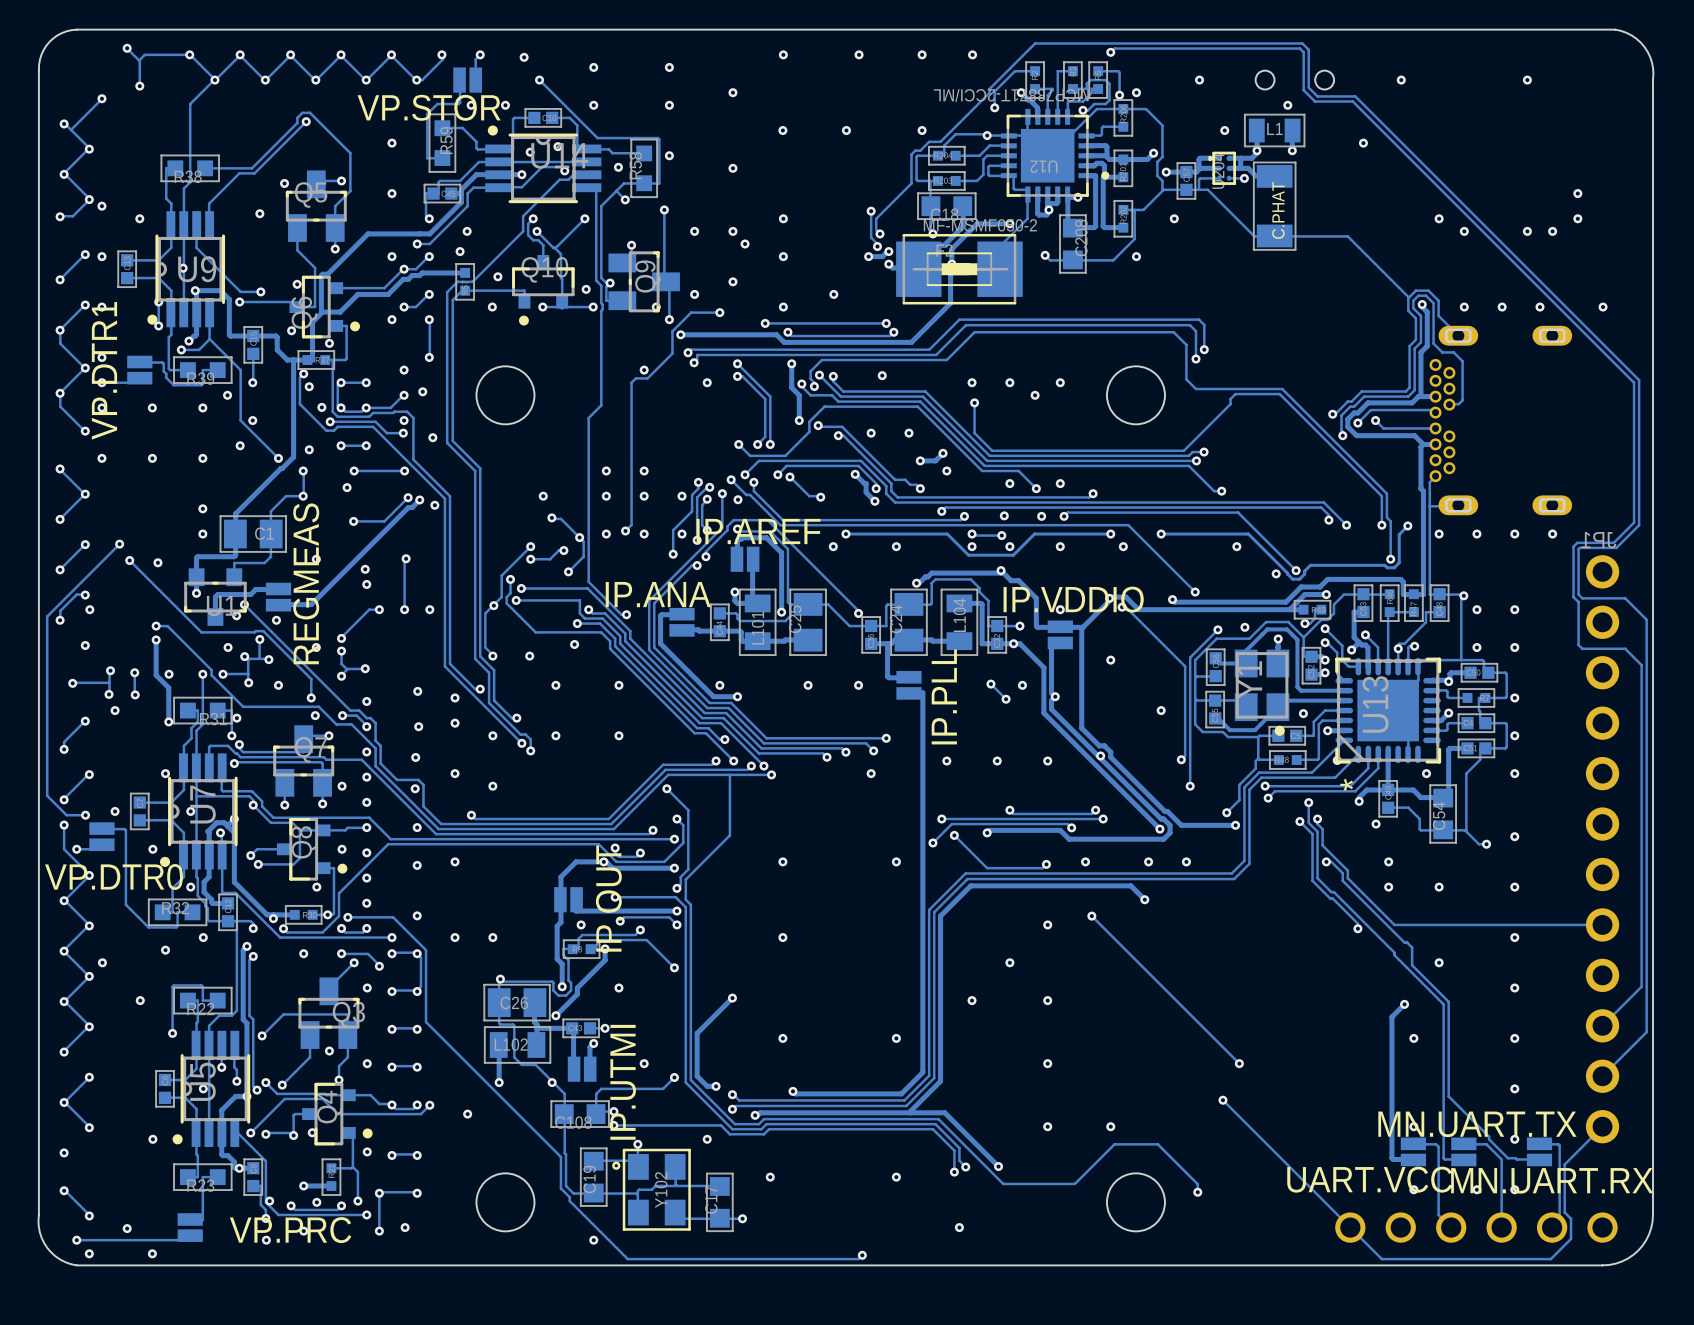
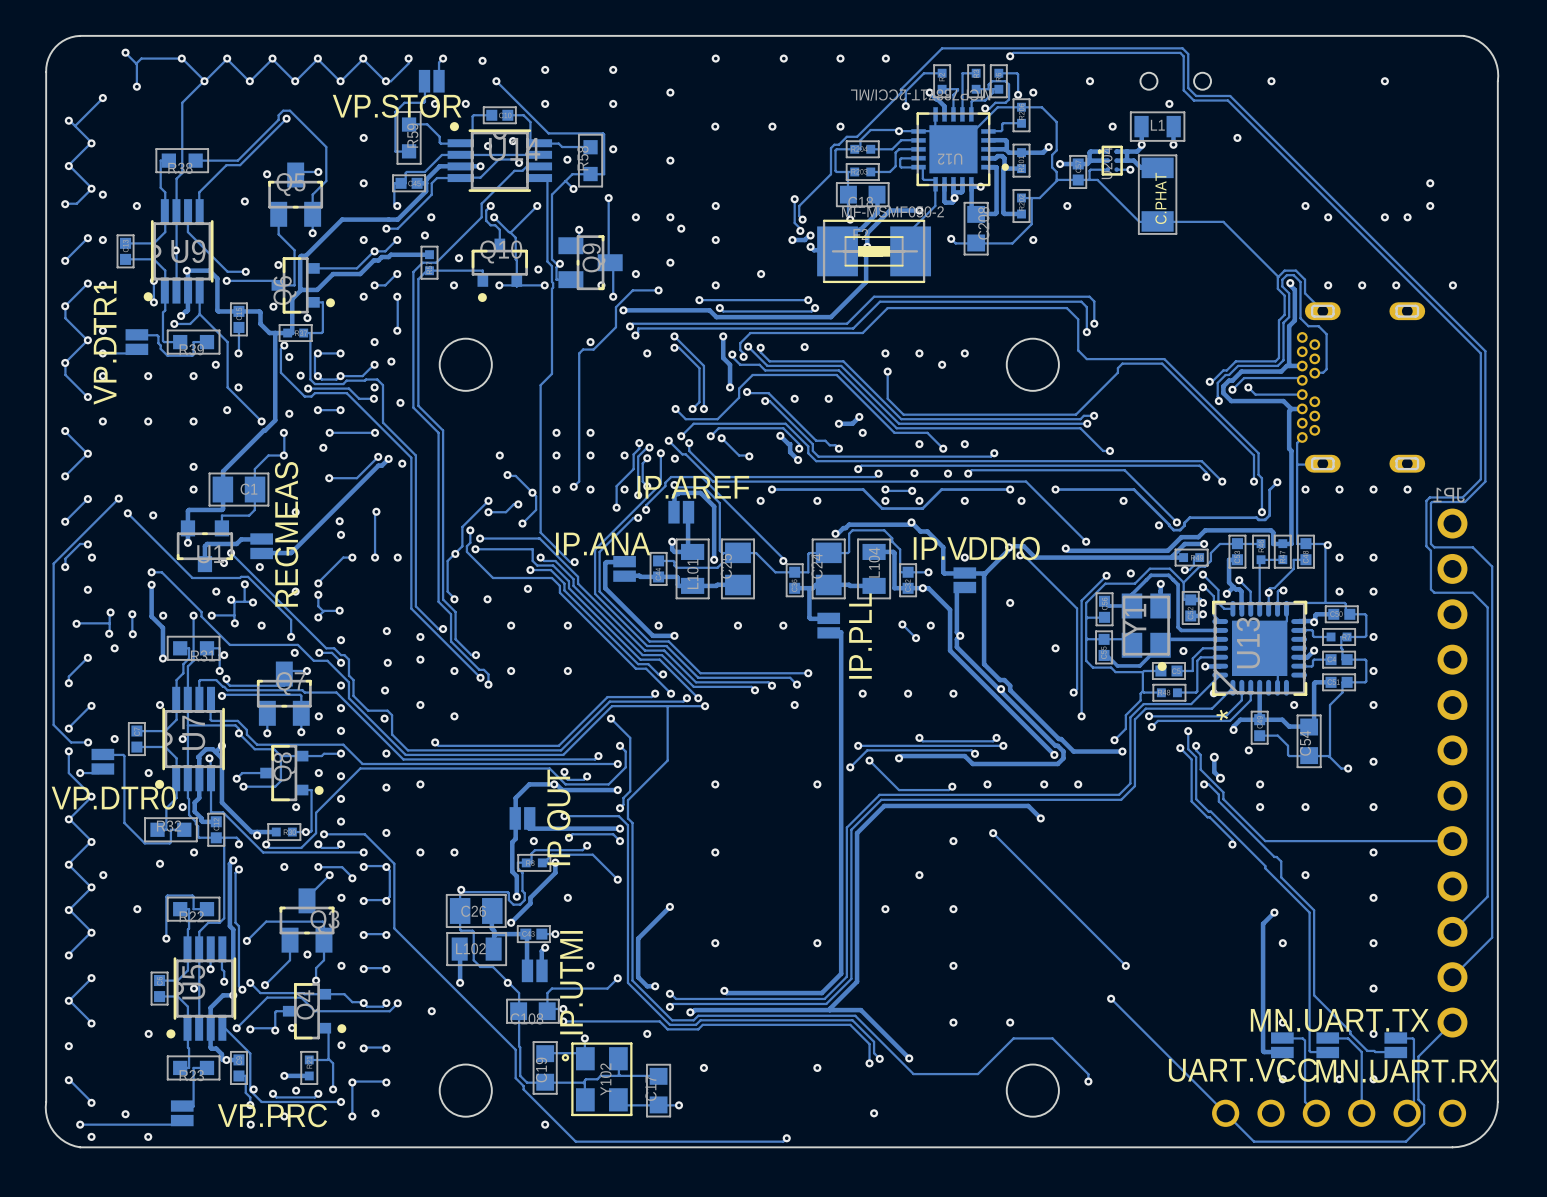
track: none -> (1214, 757) (1214, 772) (1220, 778)
via: none -> (1214, 757)
via: none -> (1220, 778)

